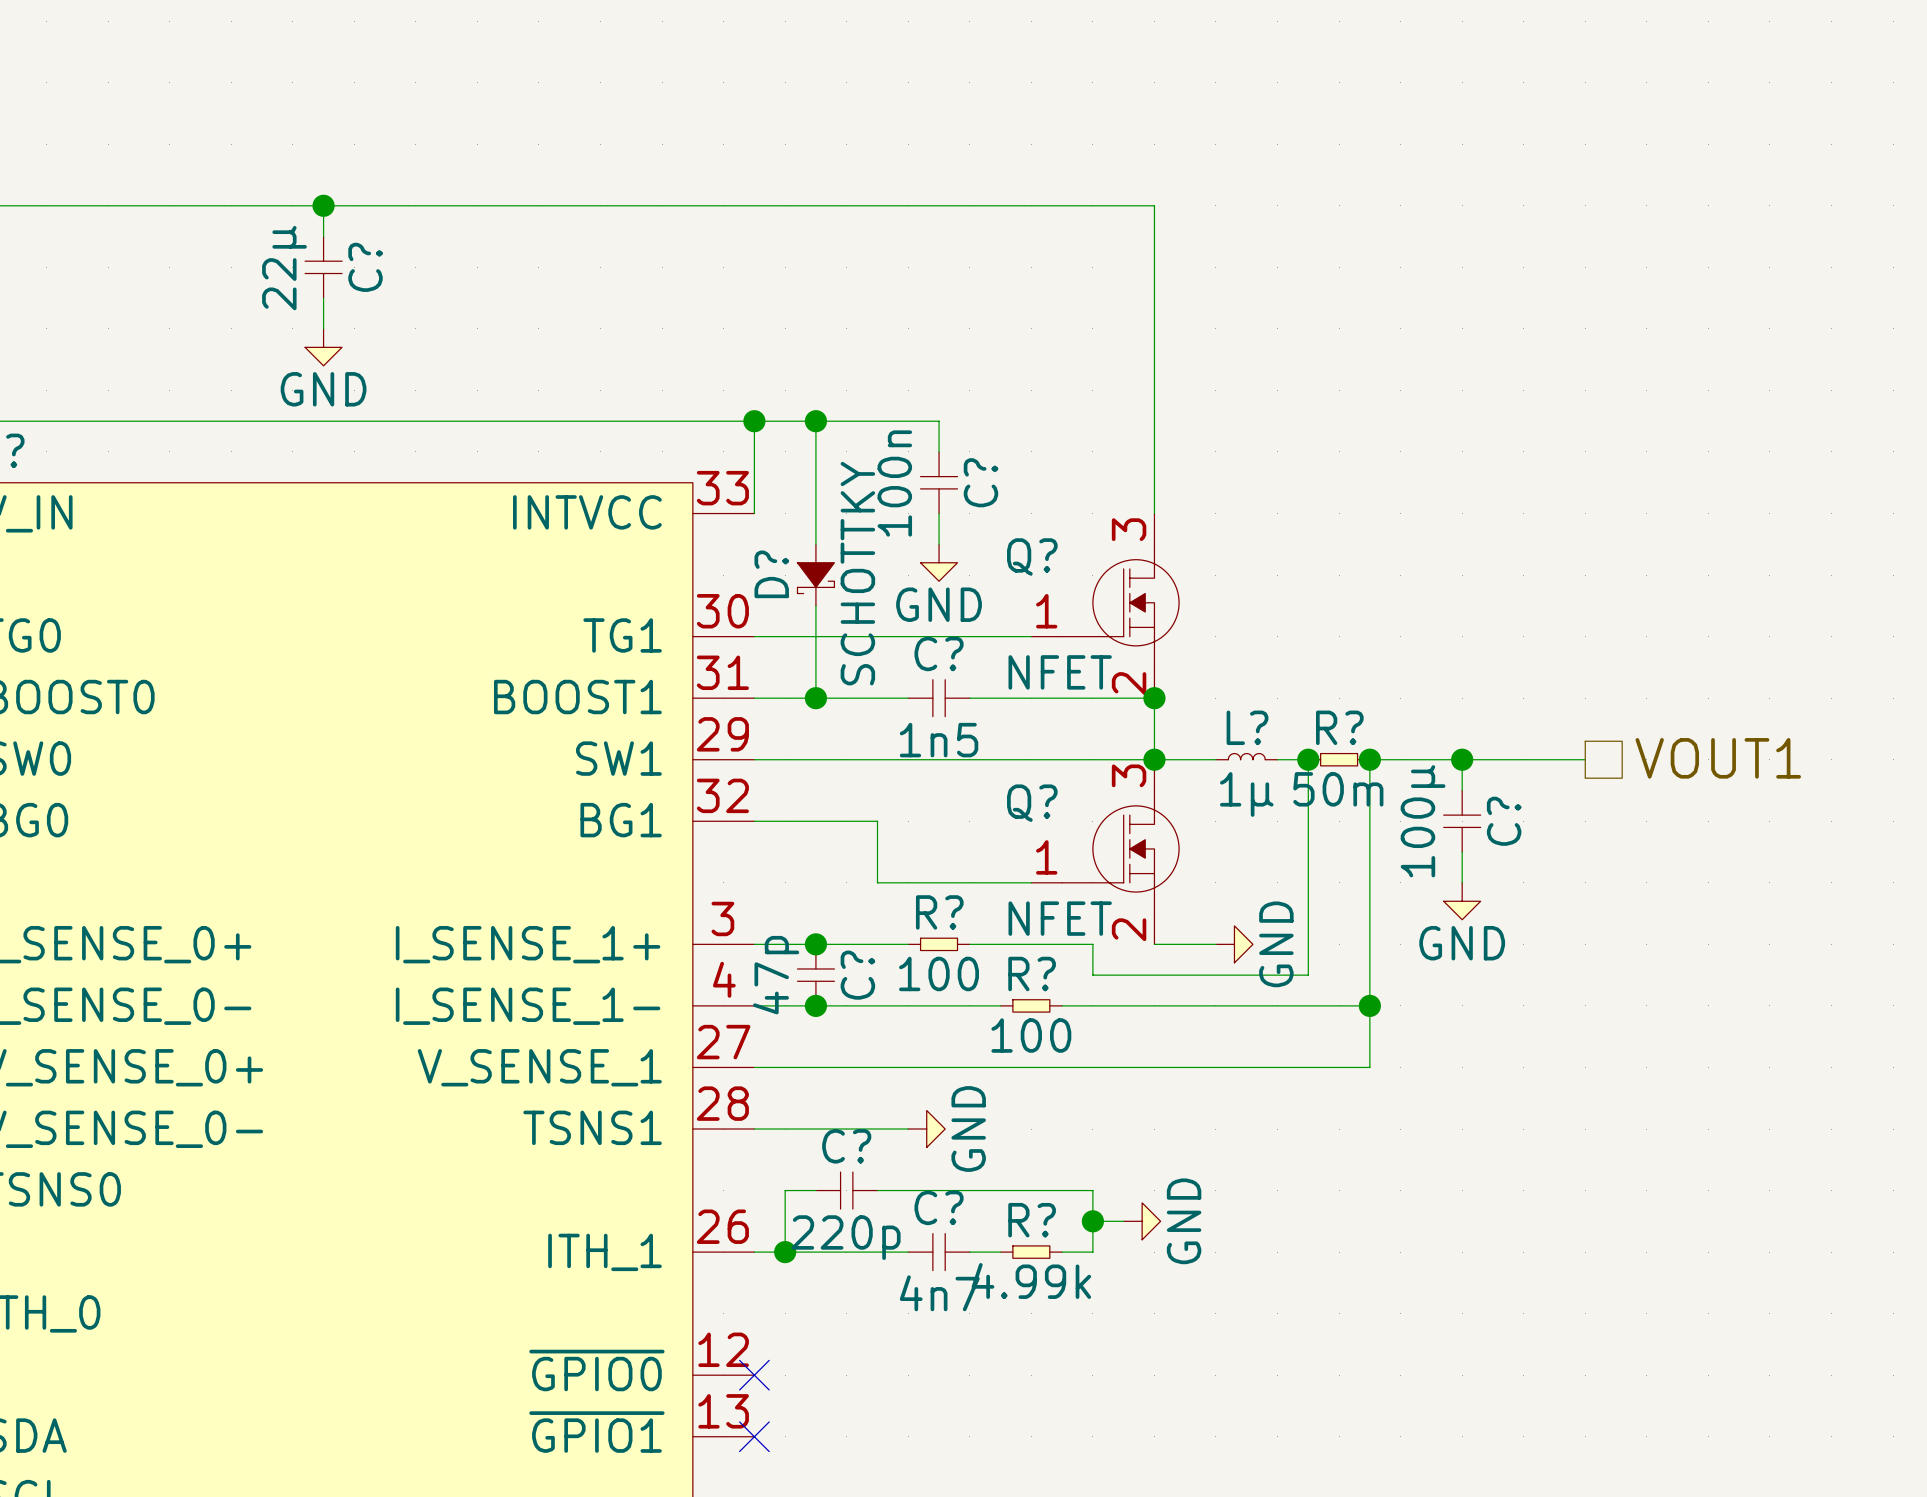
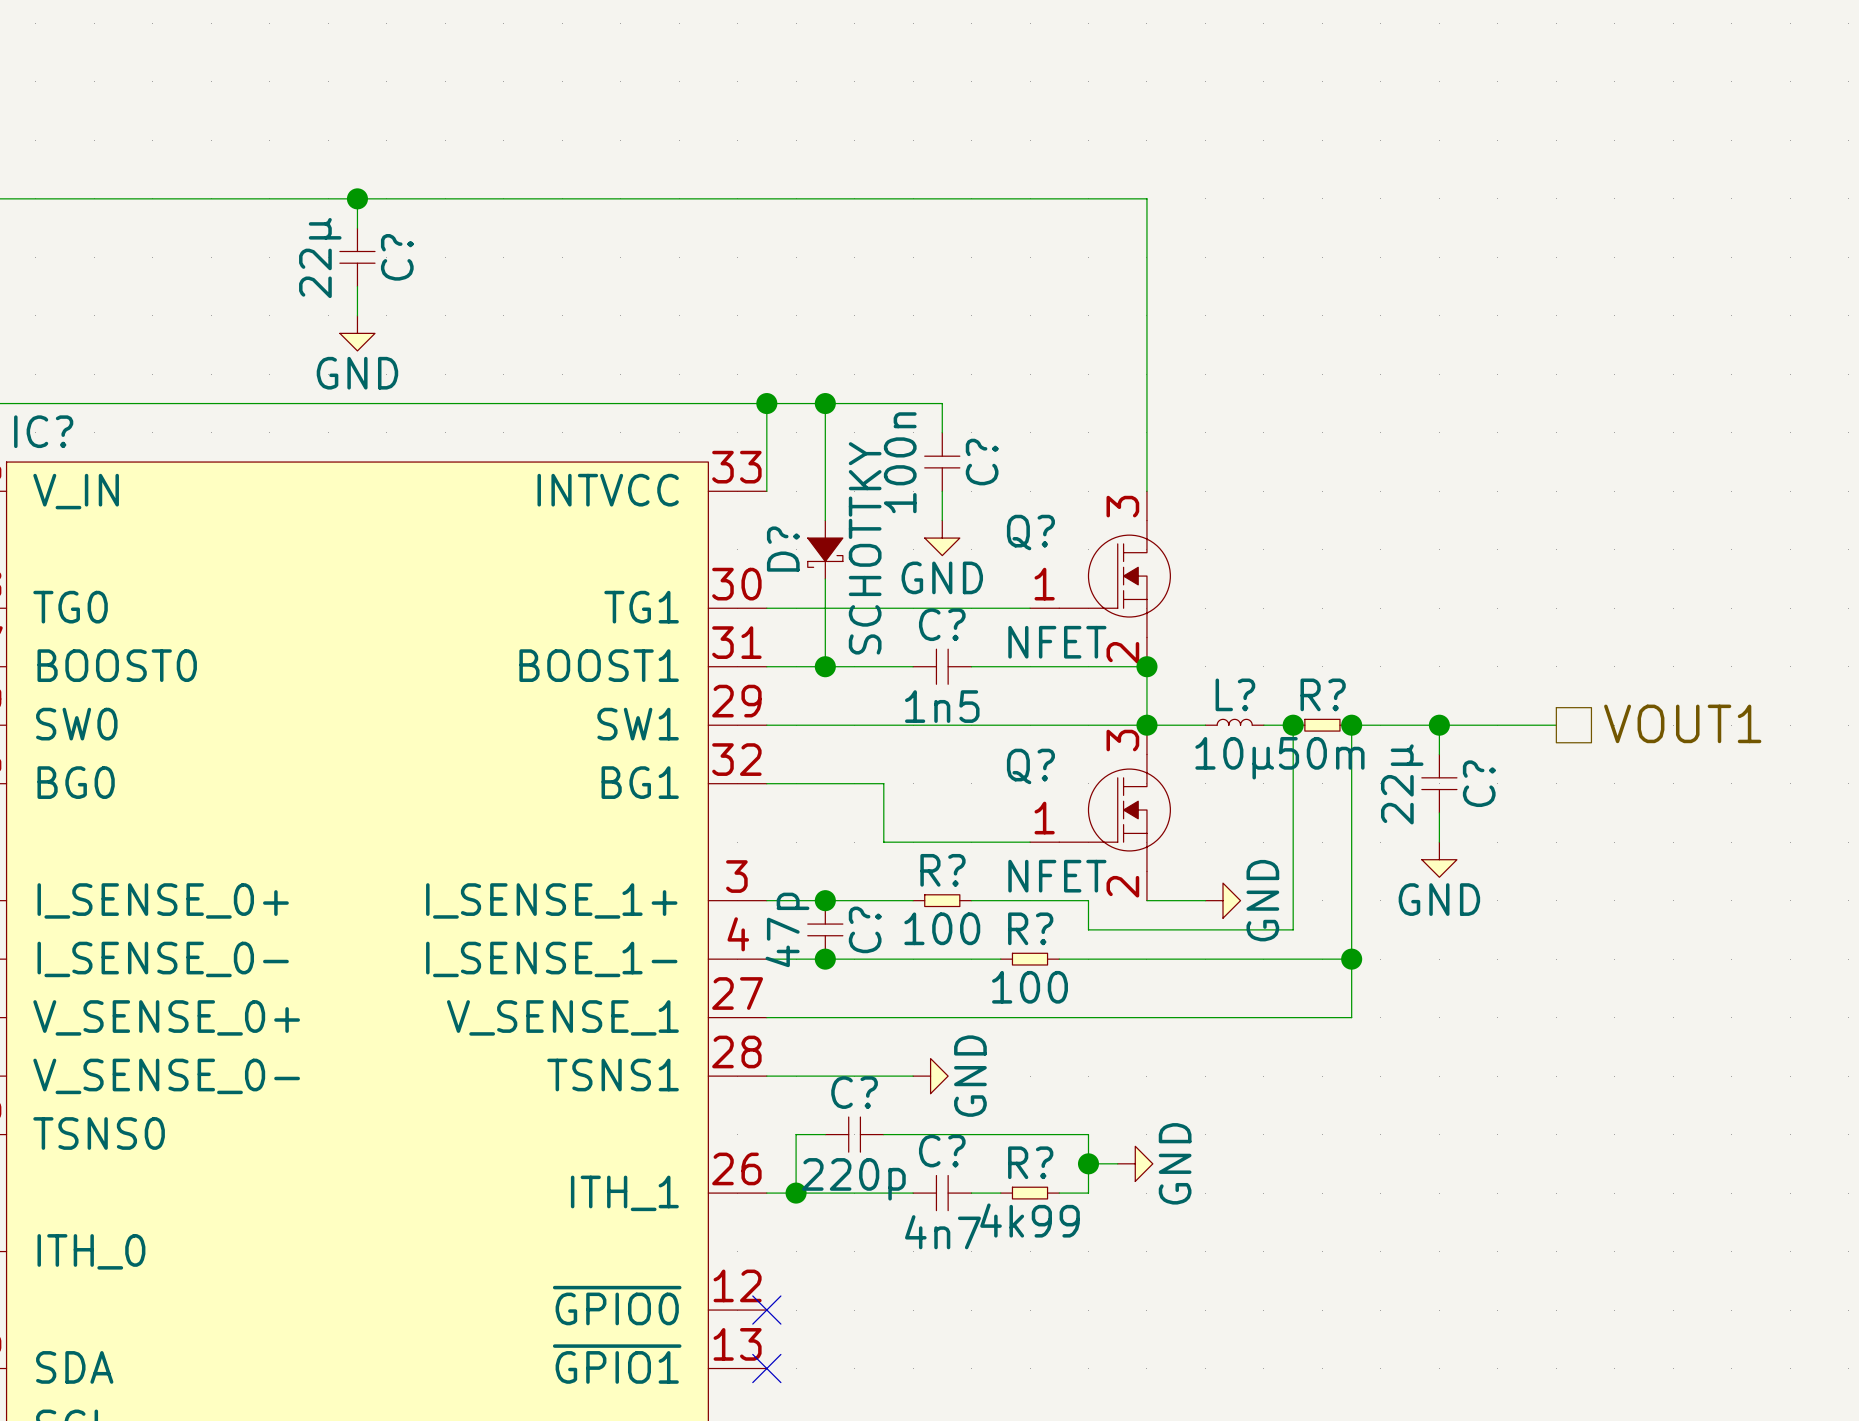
L? value: 1µ (1246, 794) -> 10µ (1234, 758)
C? value: 100µ (1423, 821) -> 22µ (1402, 784)
R? value: 4.99k (1031, 1280) -> 4k99 (1030, 1220)

